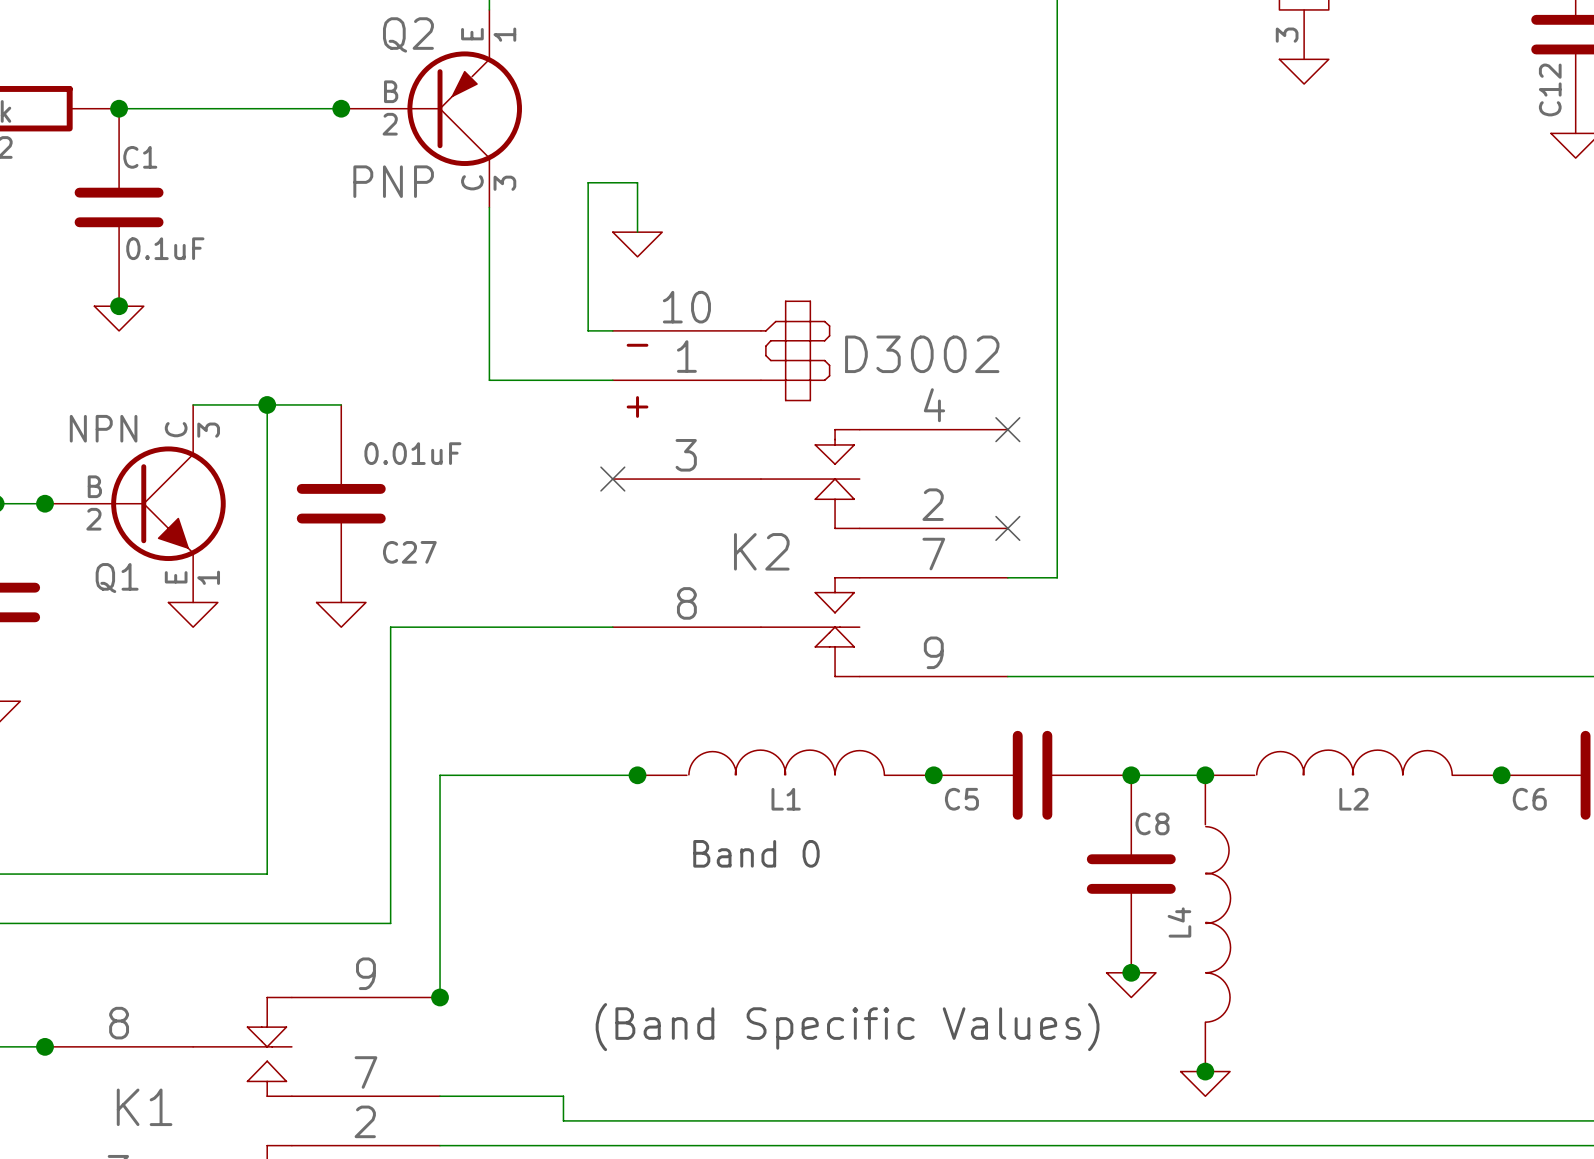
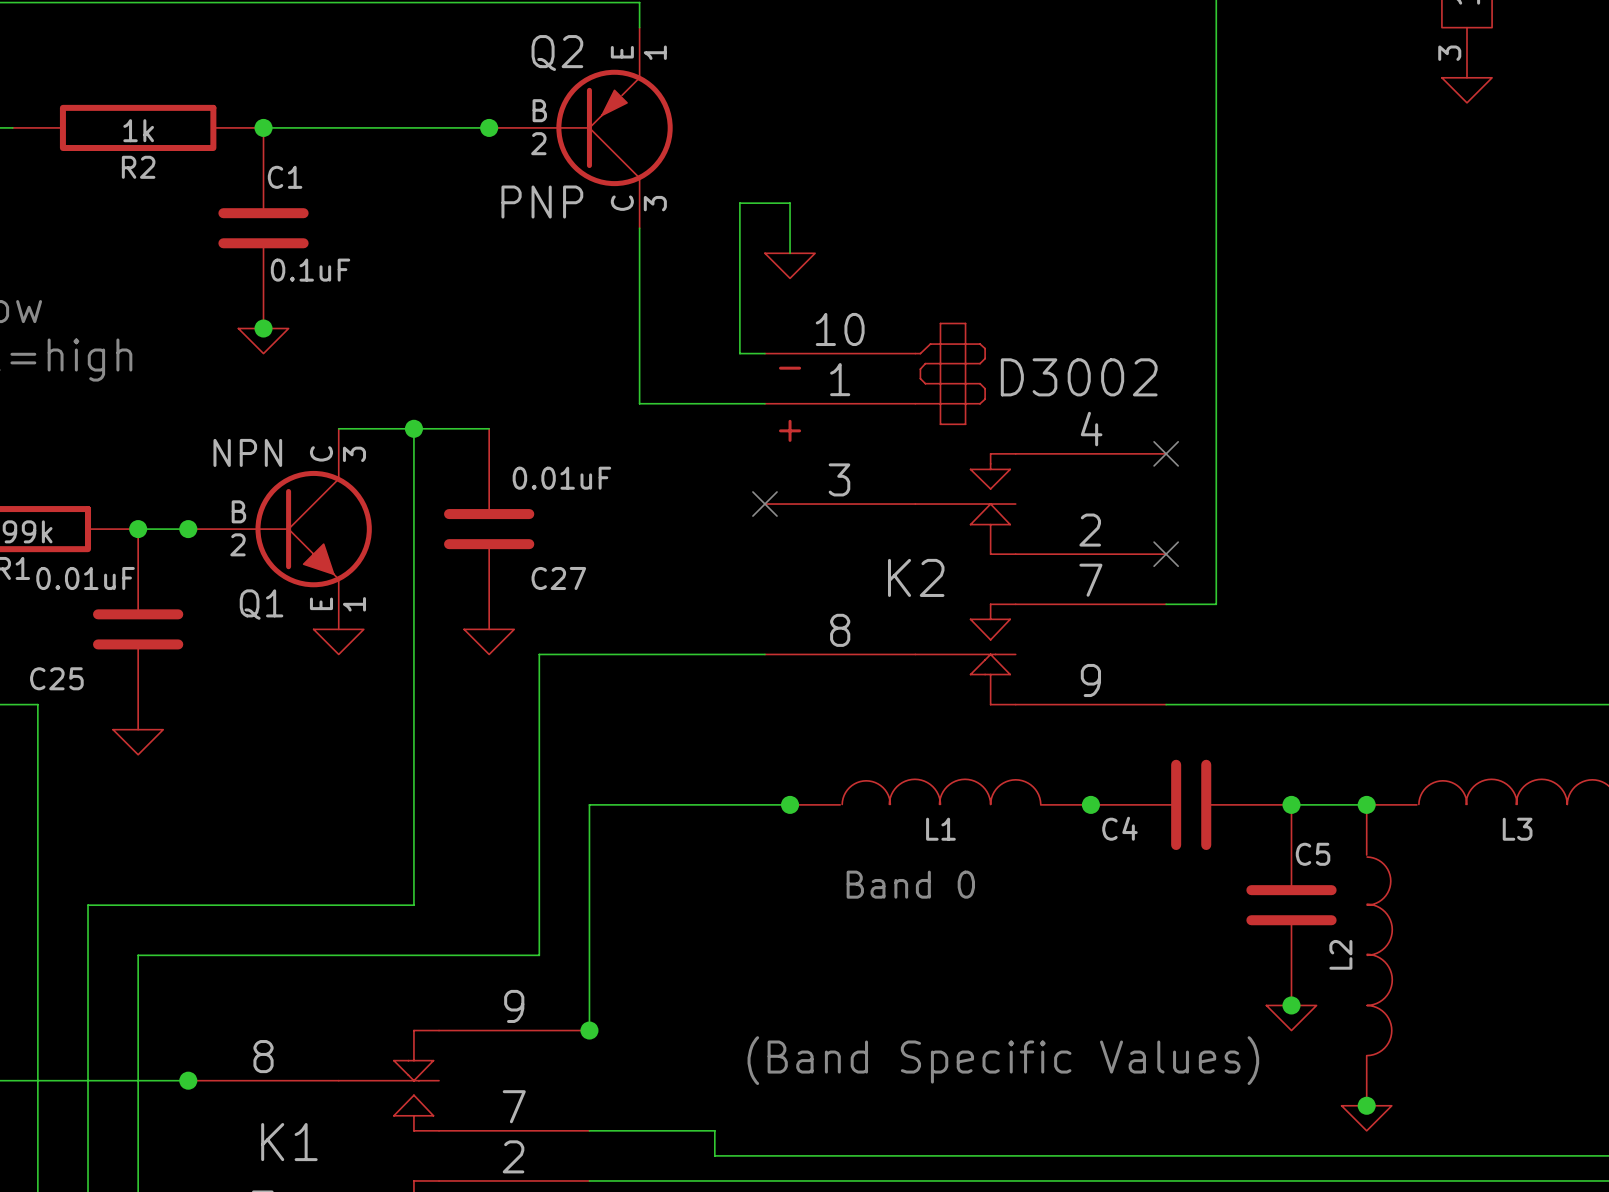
C5 name: C5 (961, 799) -> C4 (1119, 828)
L2 name: L2 (1353, 799) -> L3 (1517, 829)
C8 name: C8 (1152, 823) -> C5 (1313, 854)
L4 name: L4 (1179, 922) -> L2 (1340, 954)

